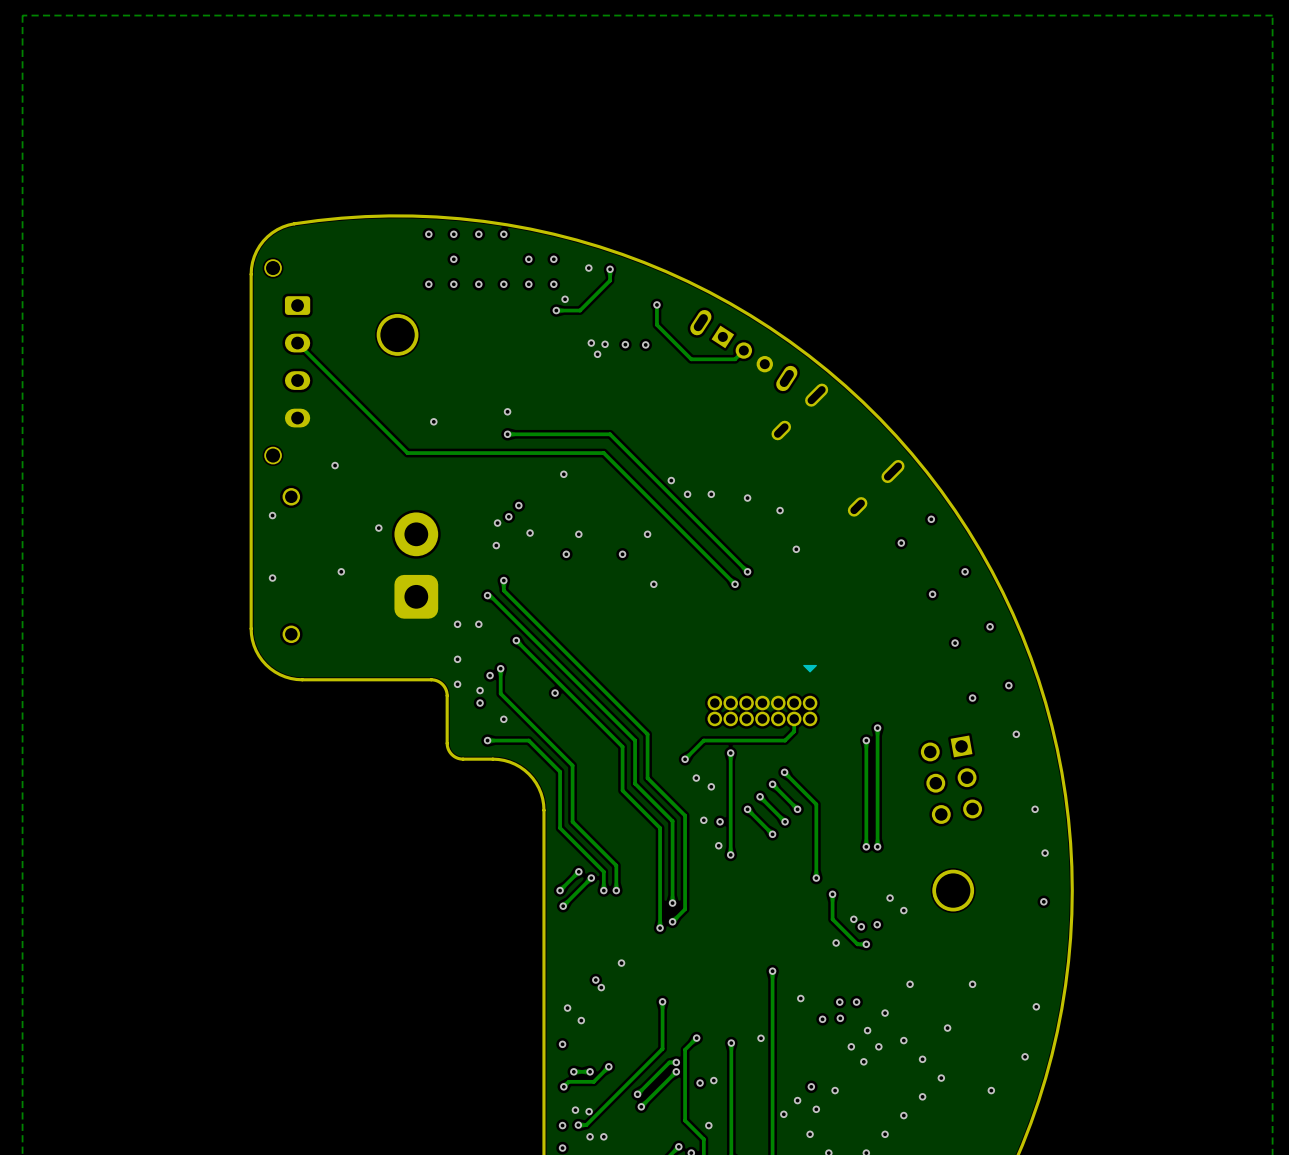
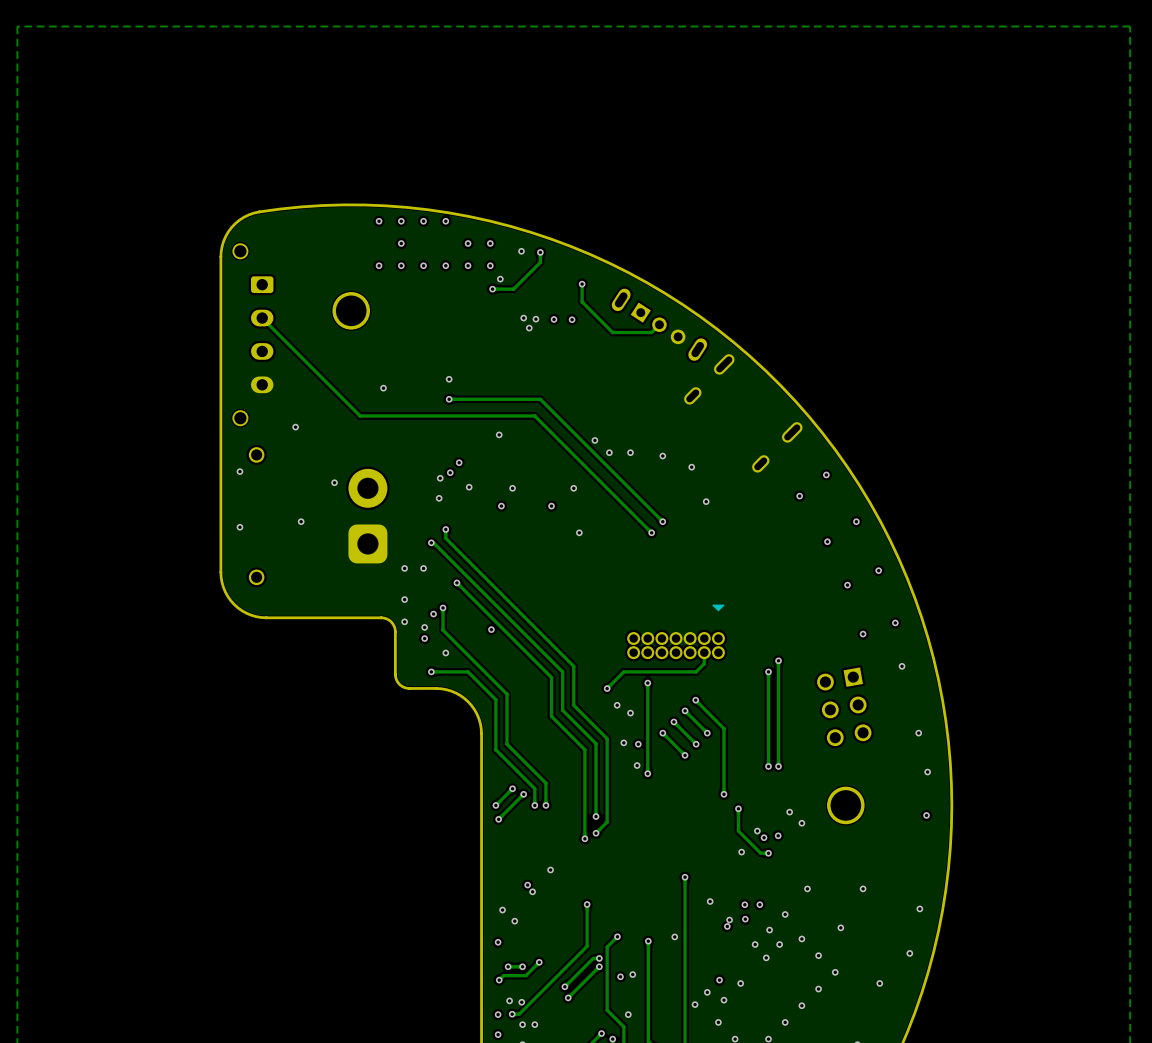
via: none -> (727, 926)

